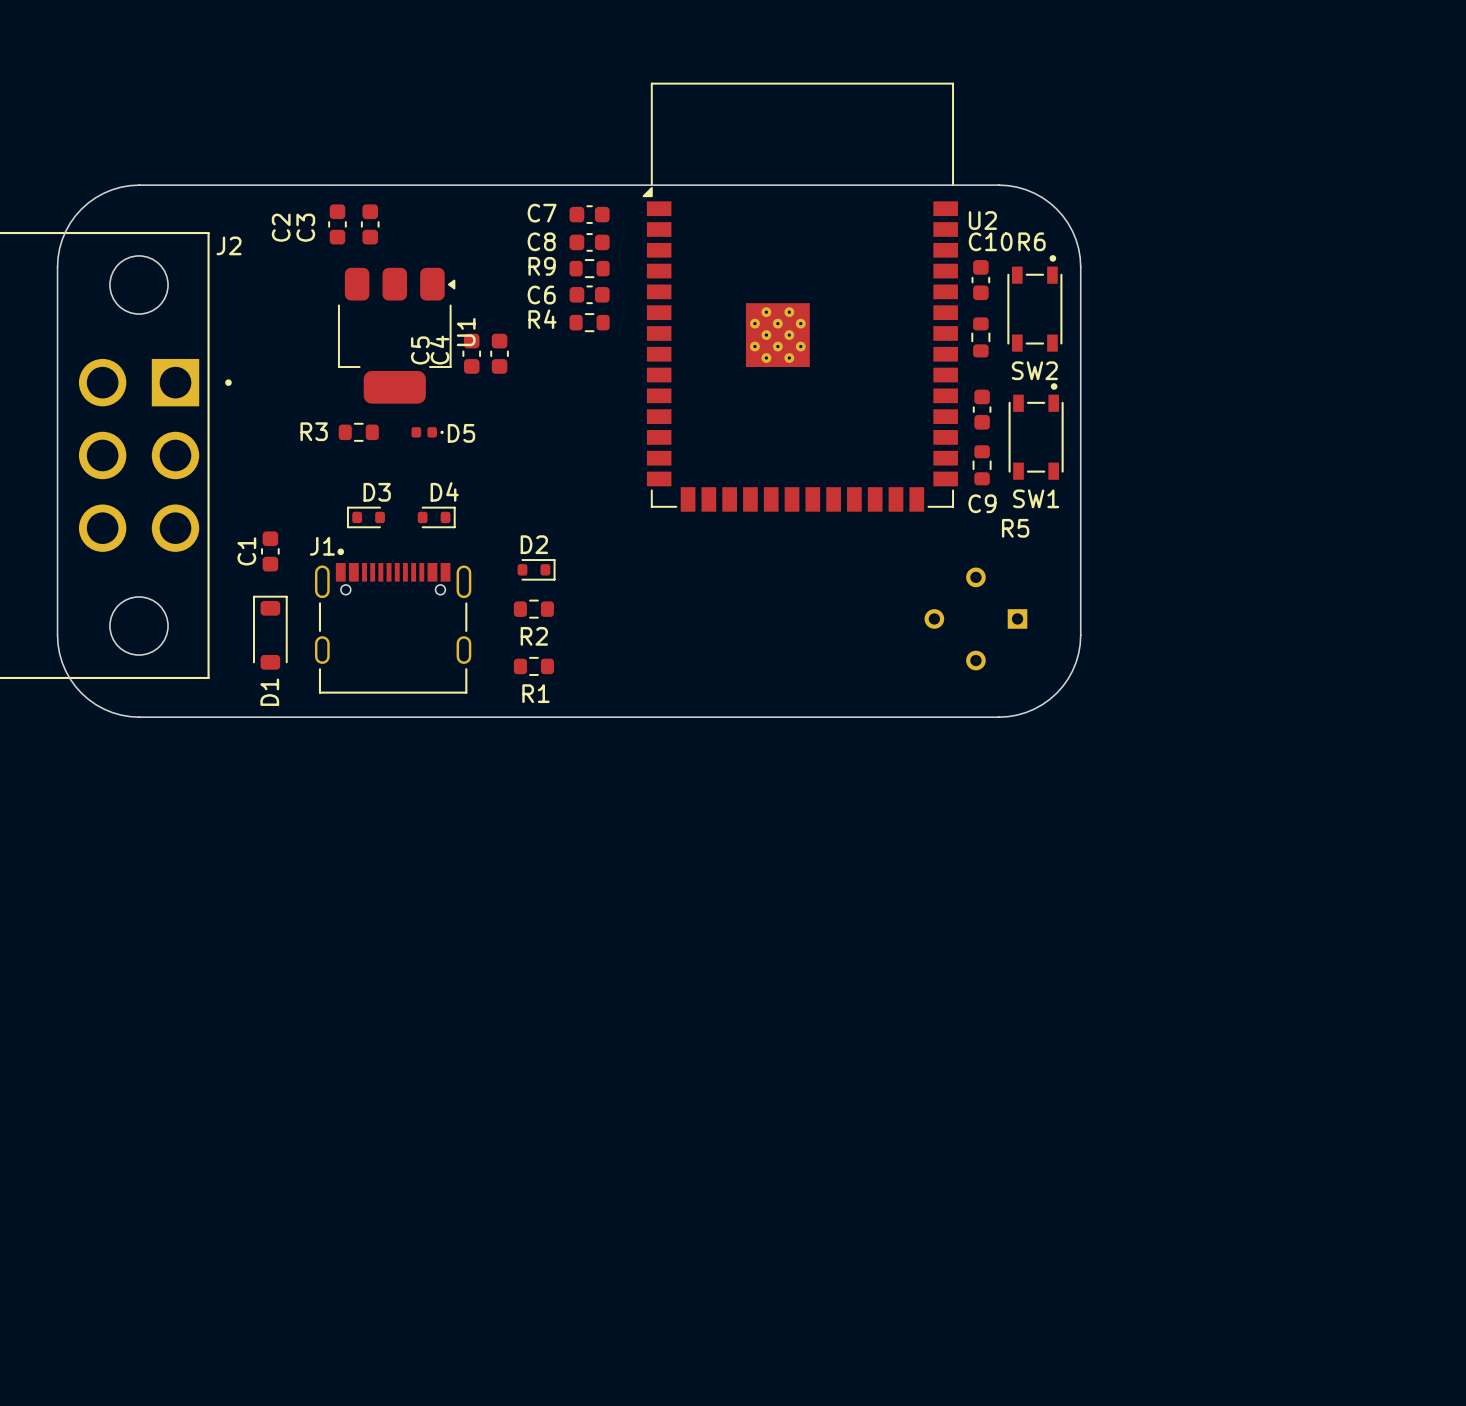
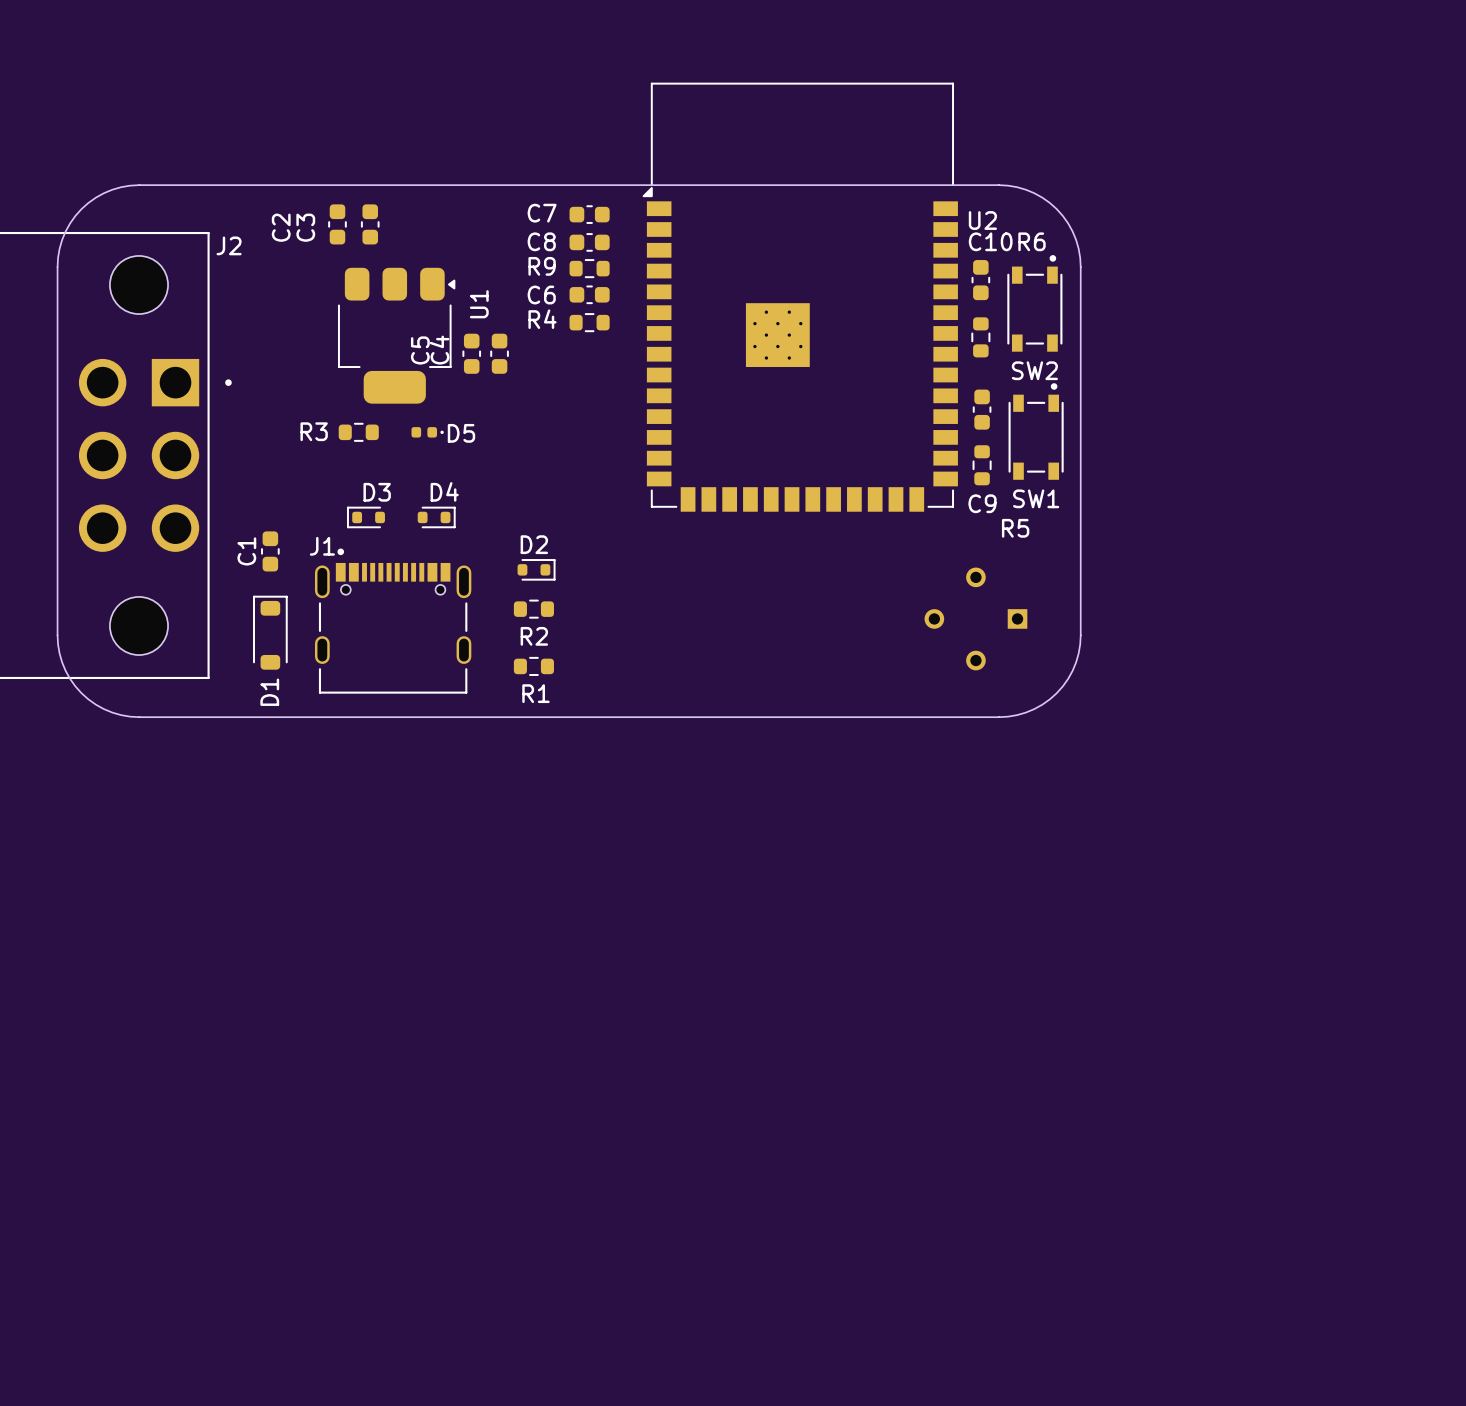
U1 name position: U1 (466, 332) -> U1 (479, 304)

